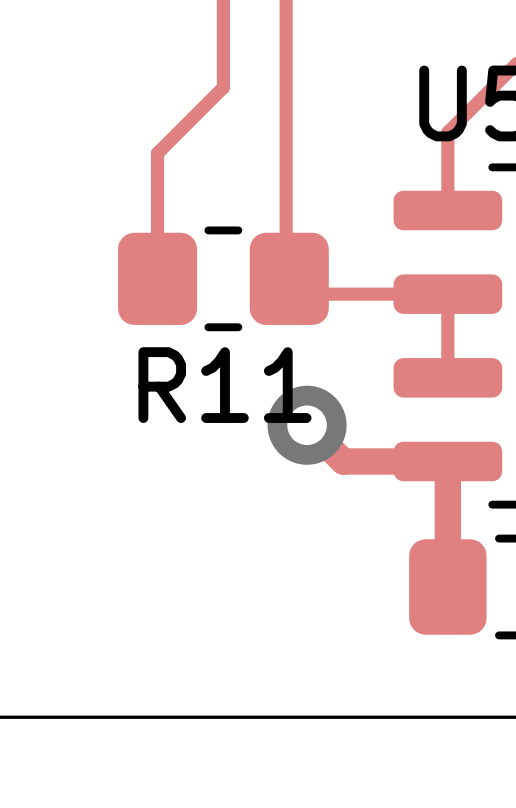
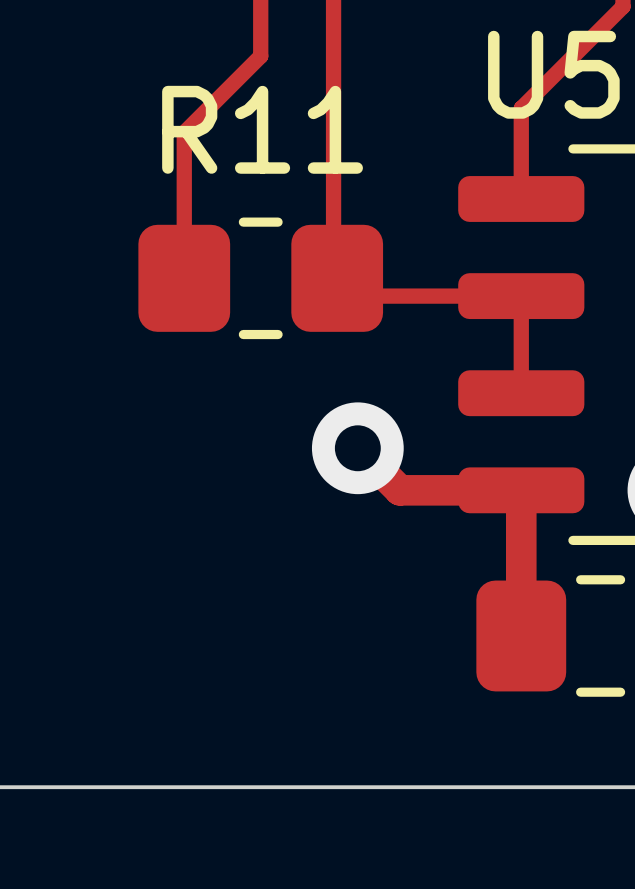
R11 name position: R11 (224, 385) -> R11 (262, 129)

